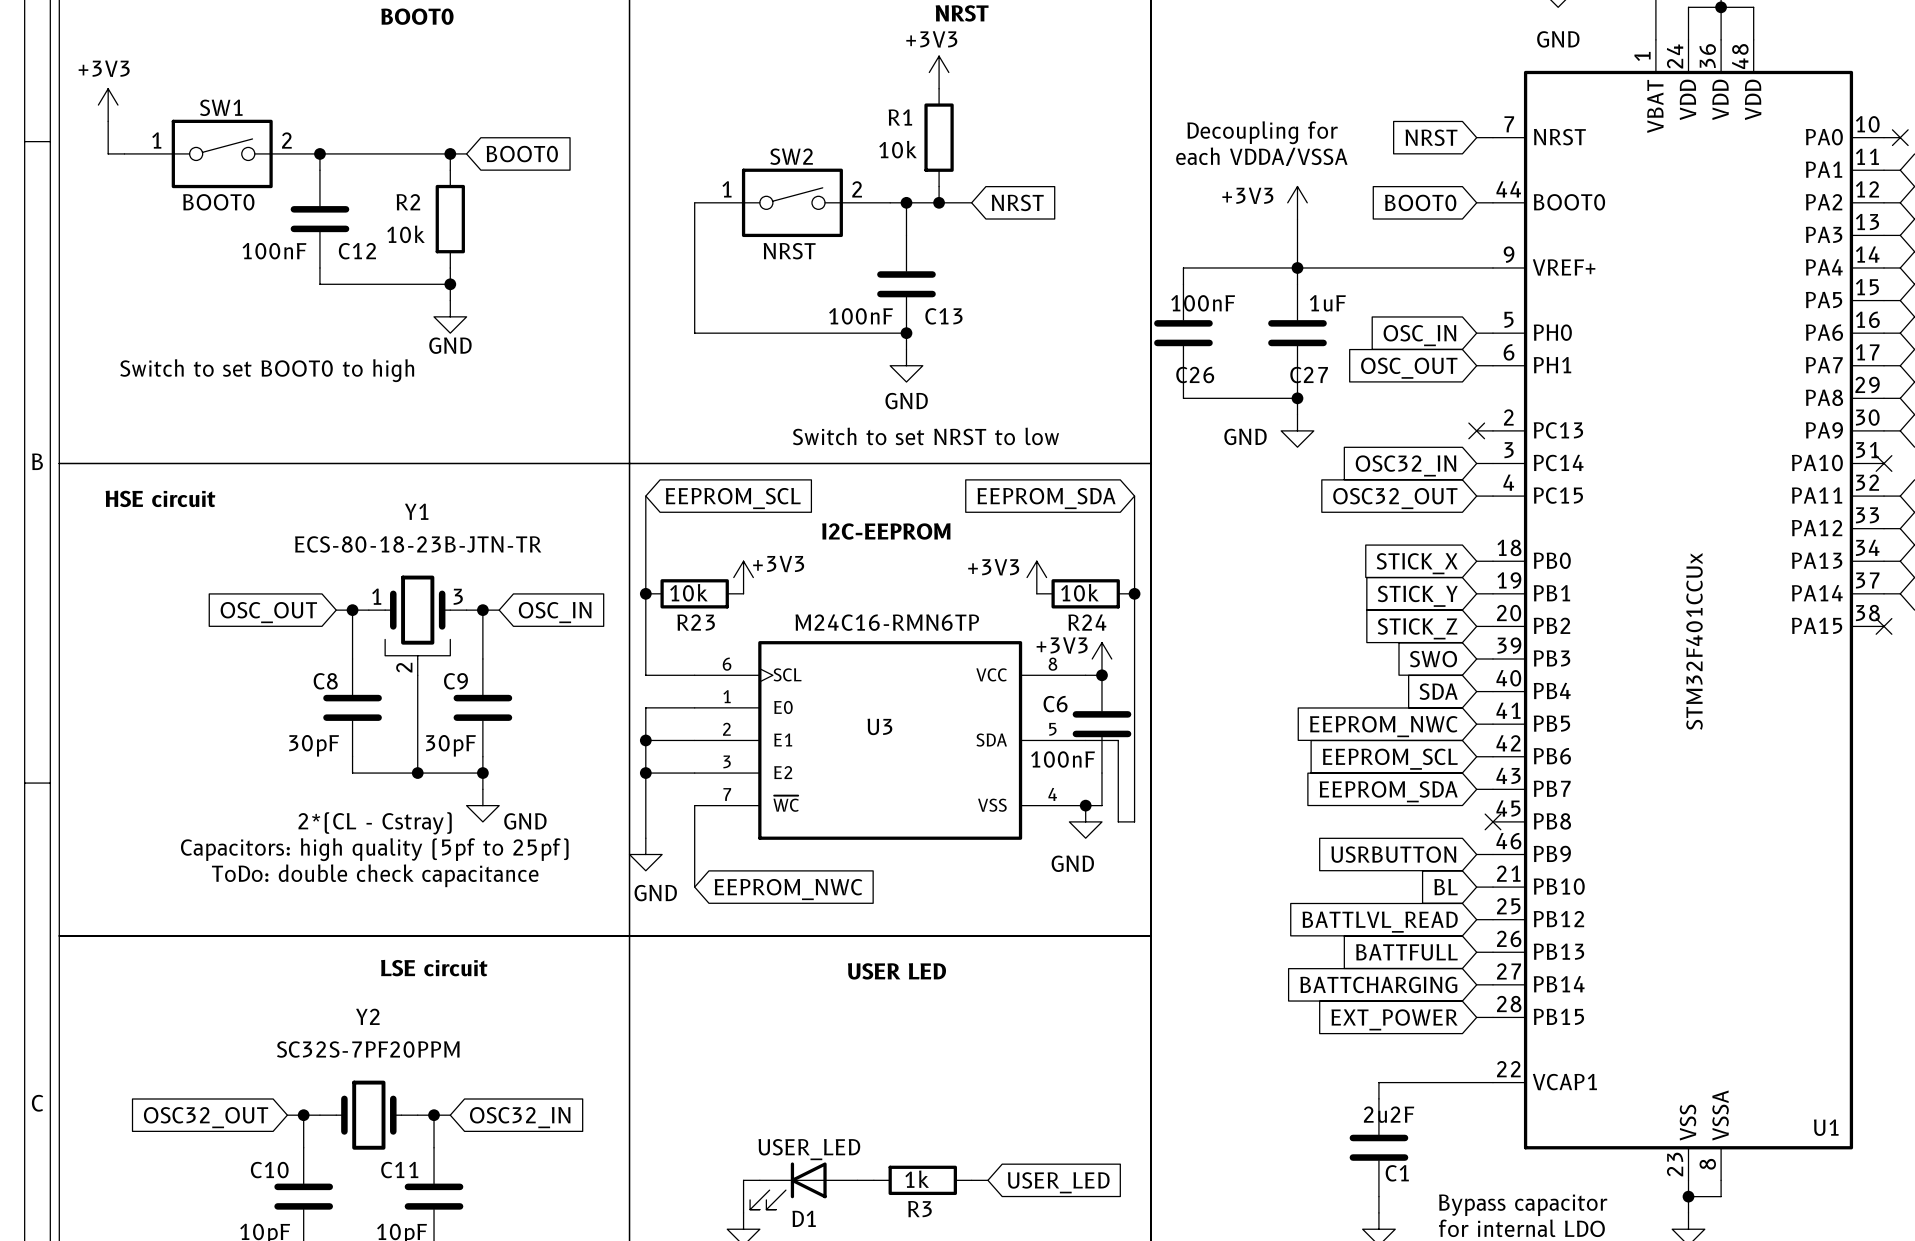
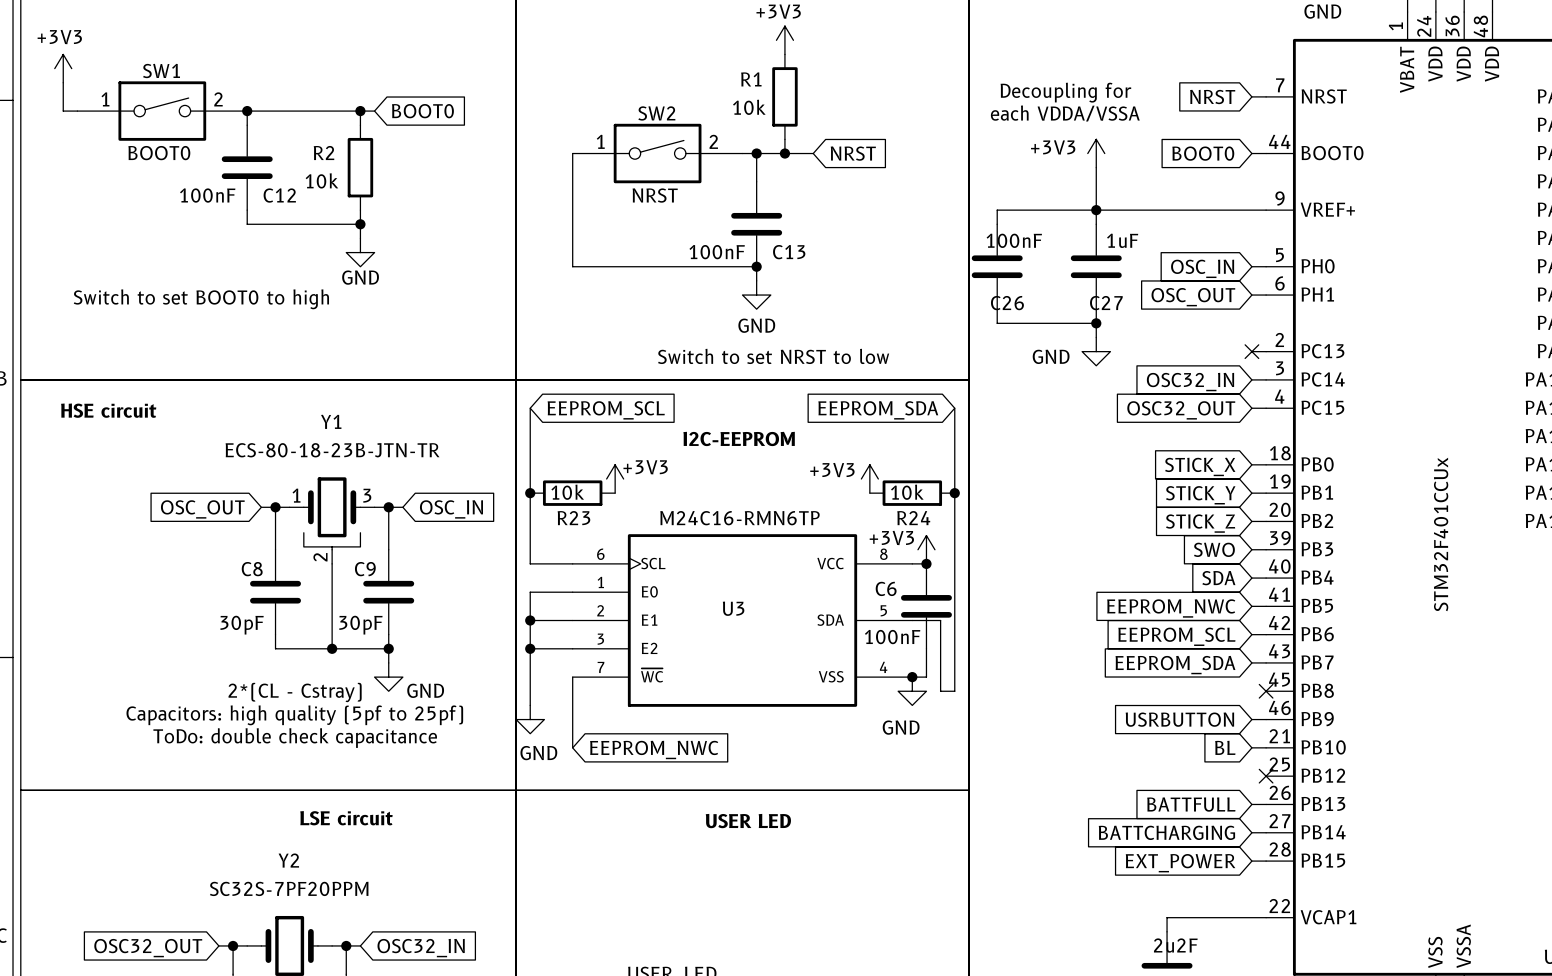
wire: (1476, 919) (1492, 919) -> none
no-connect mark: none -> (1266, 776)
global label: BATTLVL_READ (1380, 922) -> none

